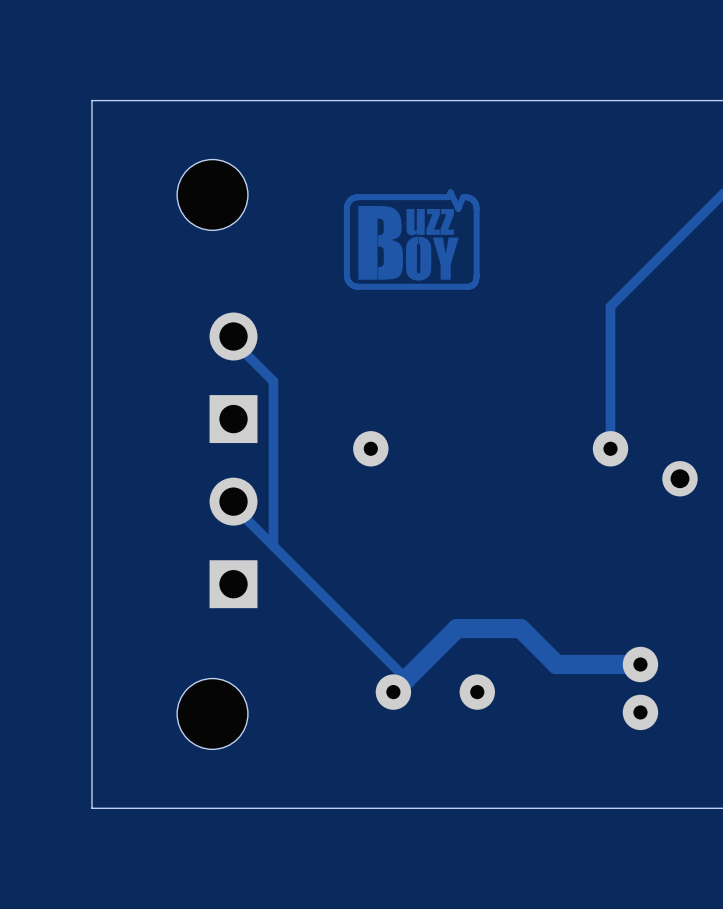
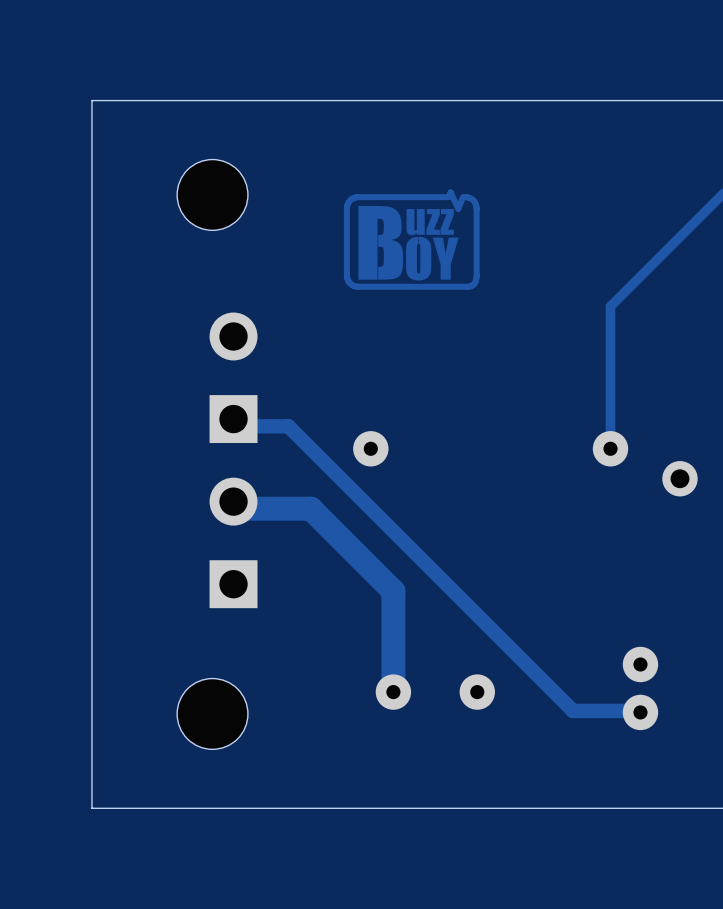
track: (233, 336) (236, 343) (273, 381) (273, 546) -> none
track: none -> (233, 419) (236, 426) (288, 426) (573, 710) (640, 712)
track: (233, 501) (236, 508) (406, 679) -> (233, 501) (240, 508) (310, 508) (393, 591) (393, 692)
track: (640, 664) (556, 664) (520, 628) (456, 628) (393, 692) -> none

